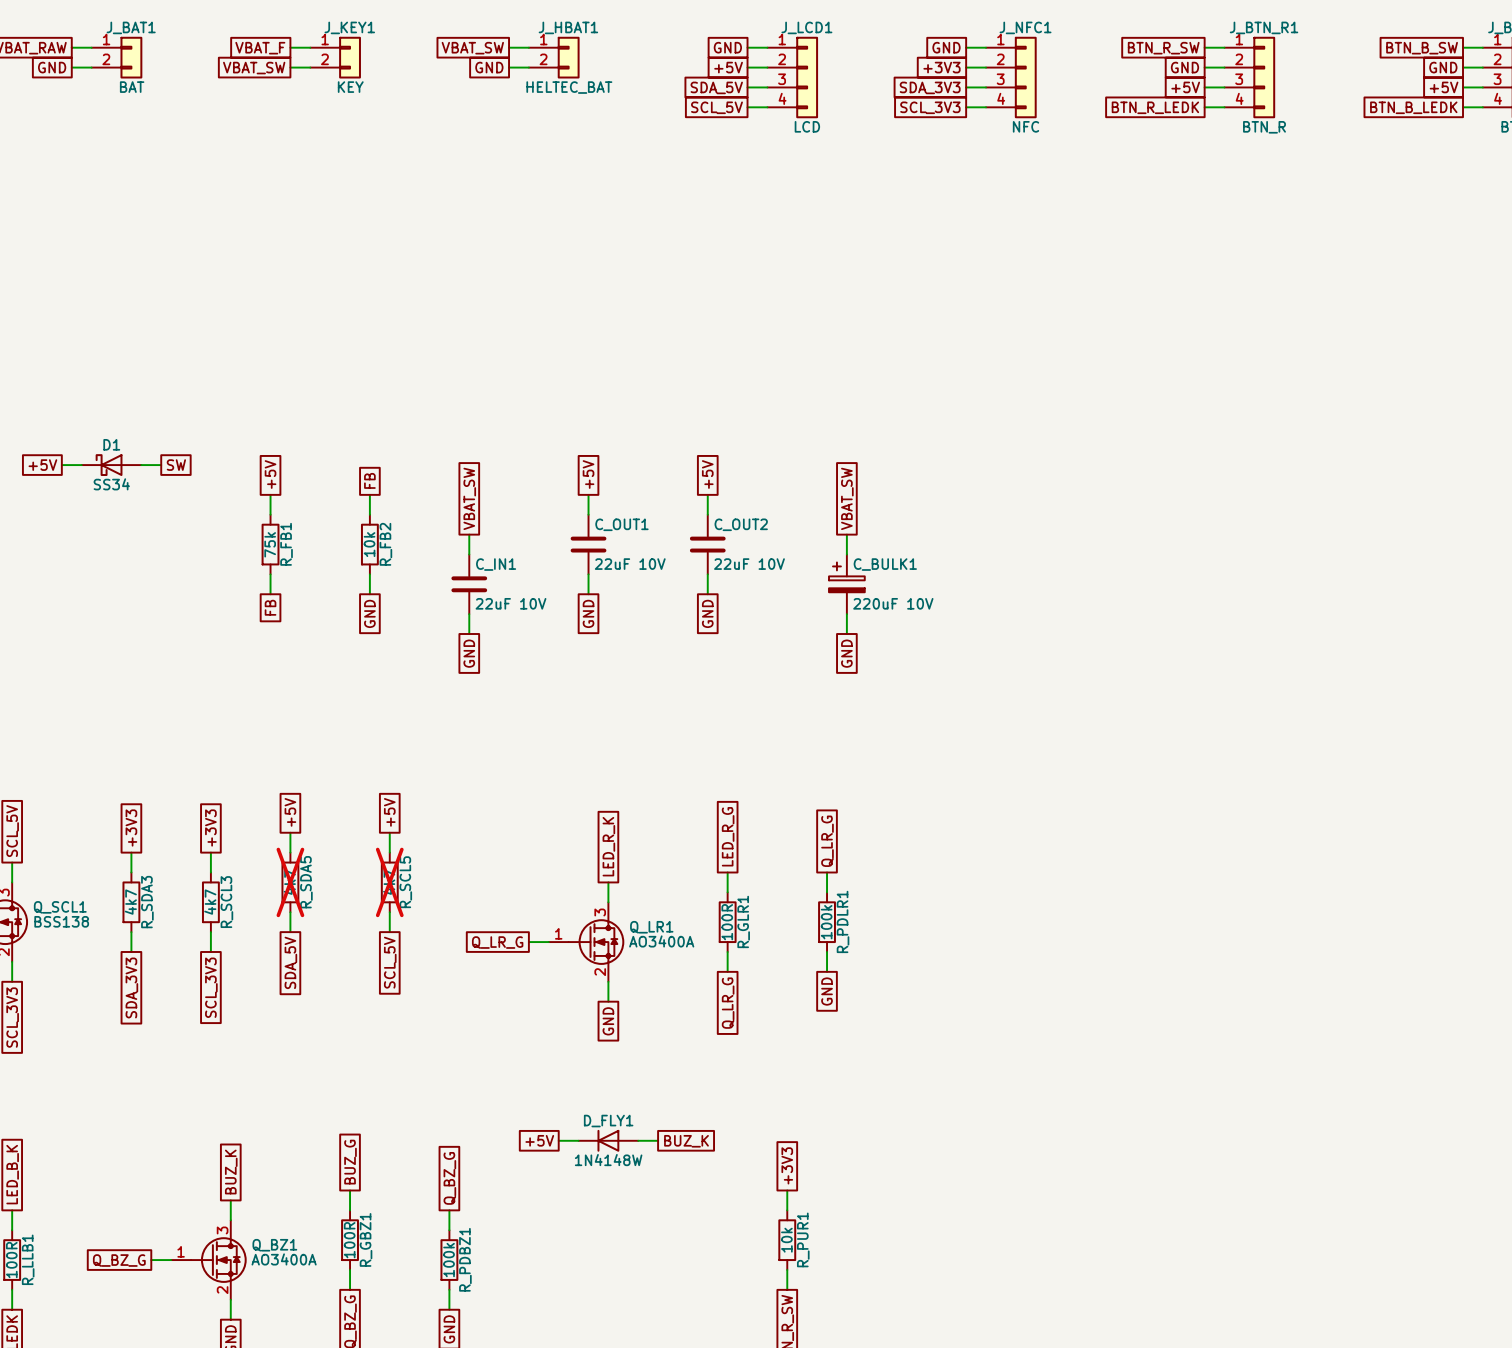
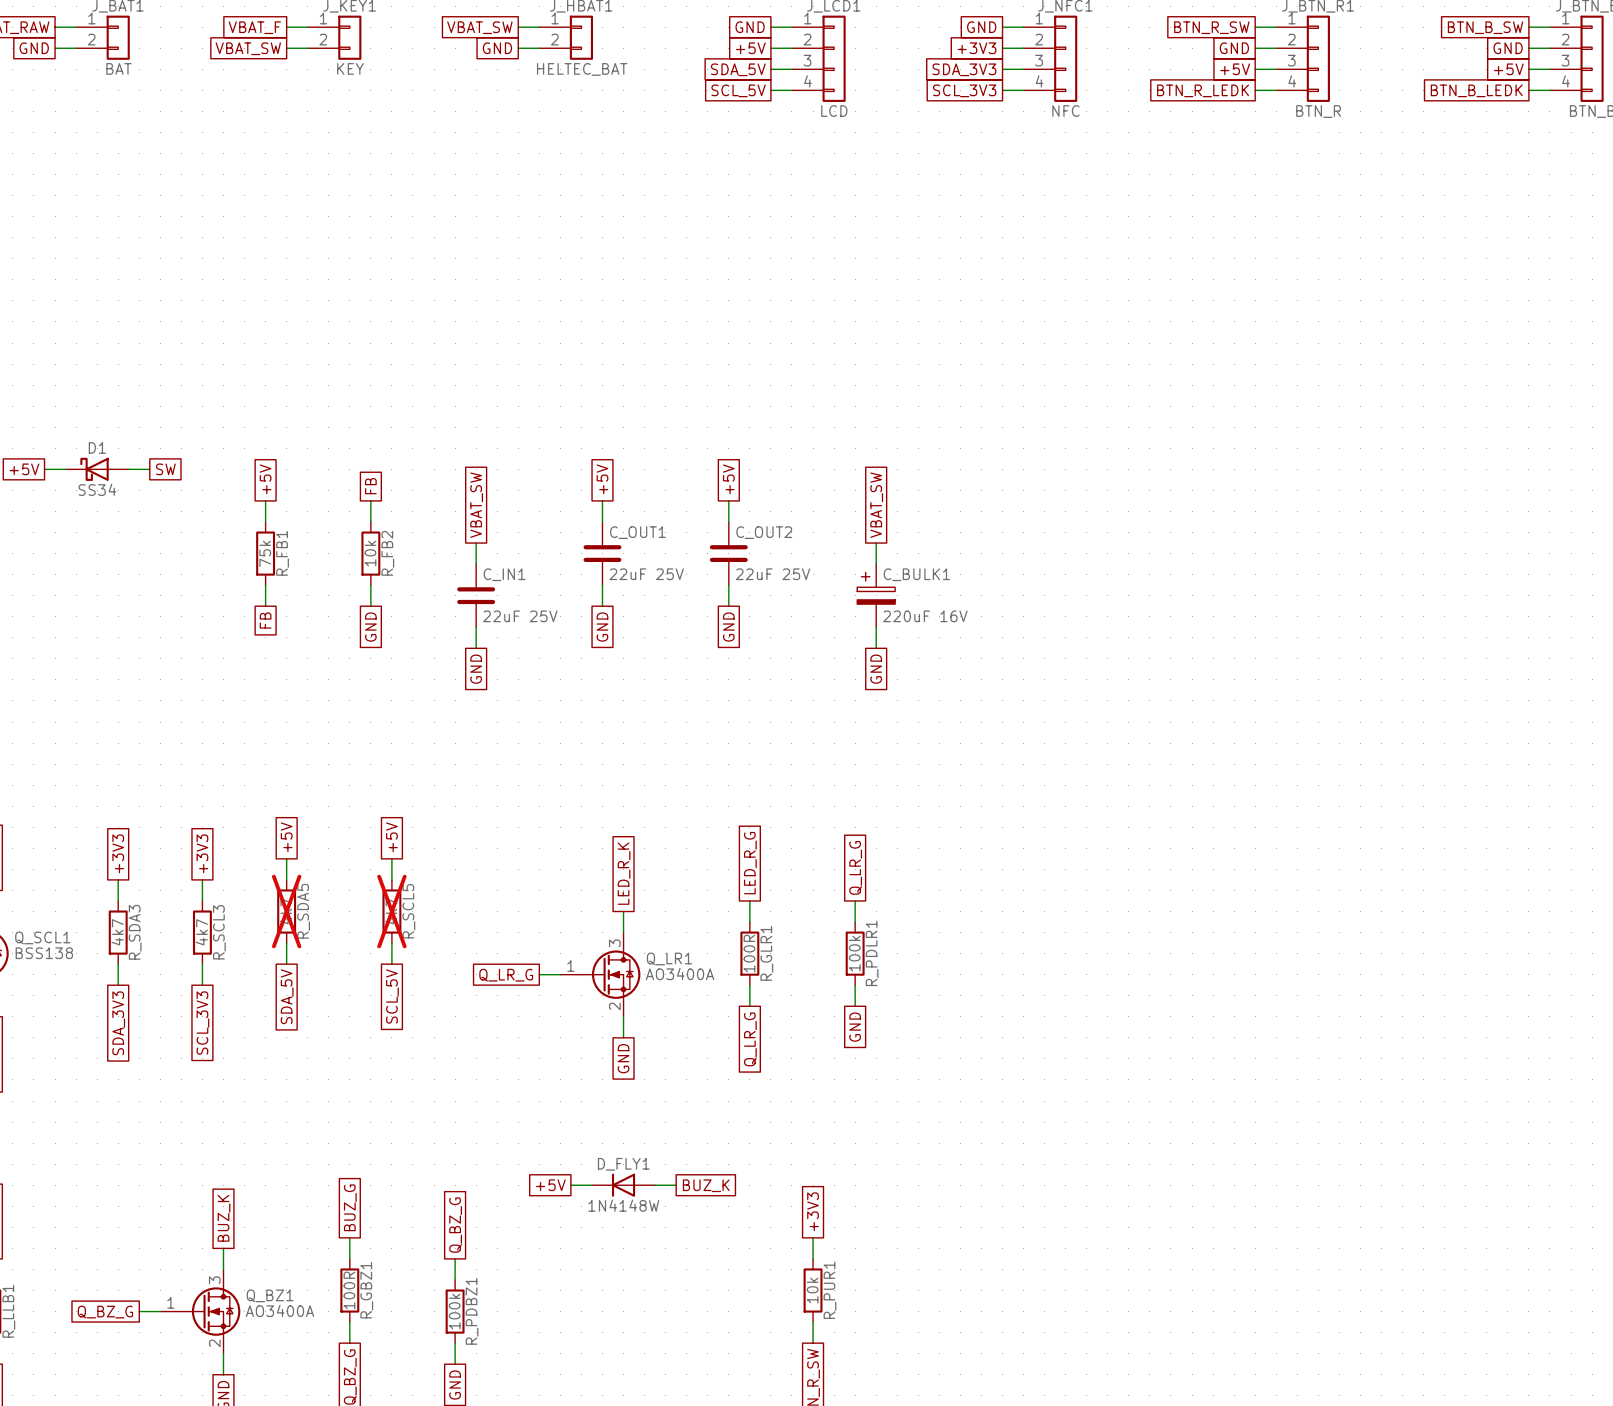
C_OUT1 value: 22uF 10V (630, 564) -> 22uF 25V (646, 574)
C_OUT2 value: 22uF 10V (749, 564) -> 22uF 25V (773, 574)
C_IN1 value: 22uF 10V (510, 603) -> 22uF 25V (520, 616)
C_BULK1 value: 220uF 10V (893, 603) -> 220uF 16V (925, 616)

